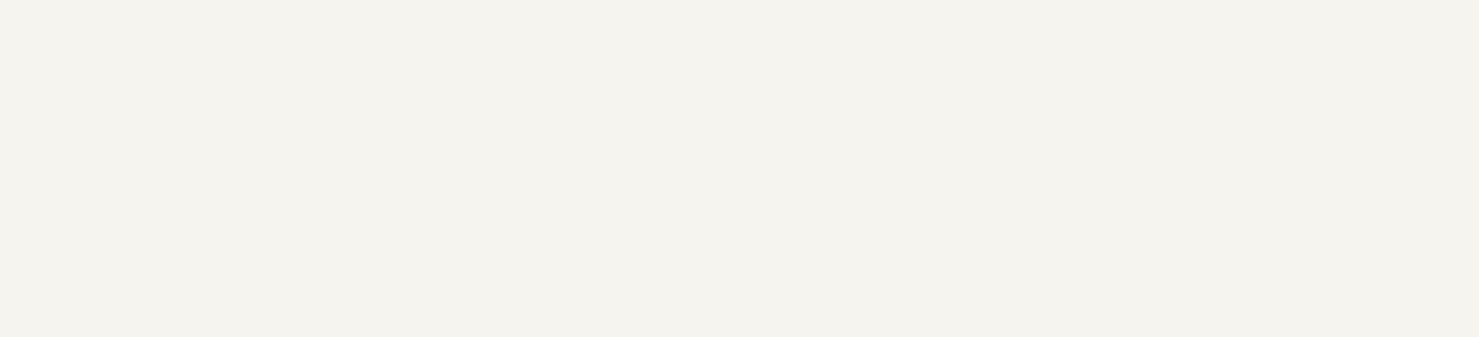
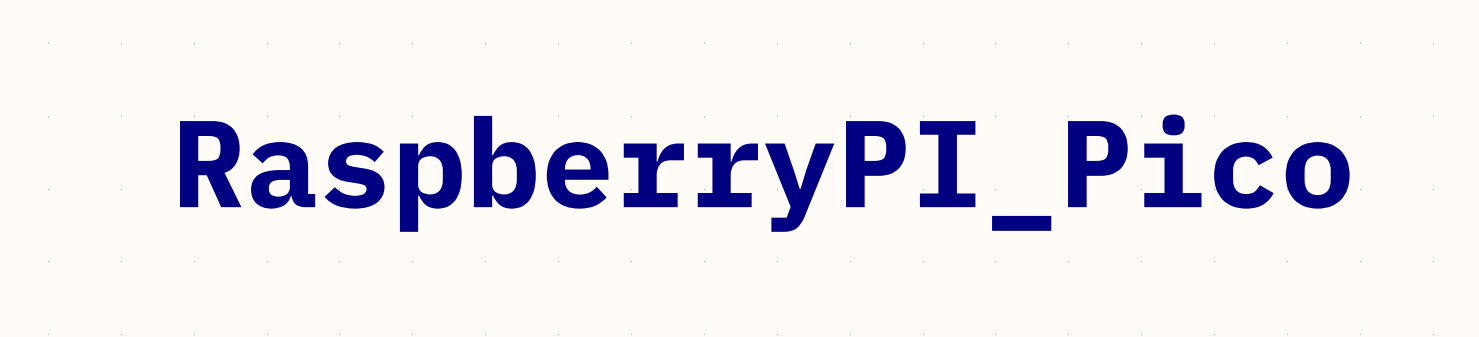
text: none -> RaspberryPI_Pico (764, 173)

